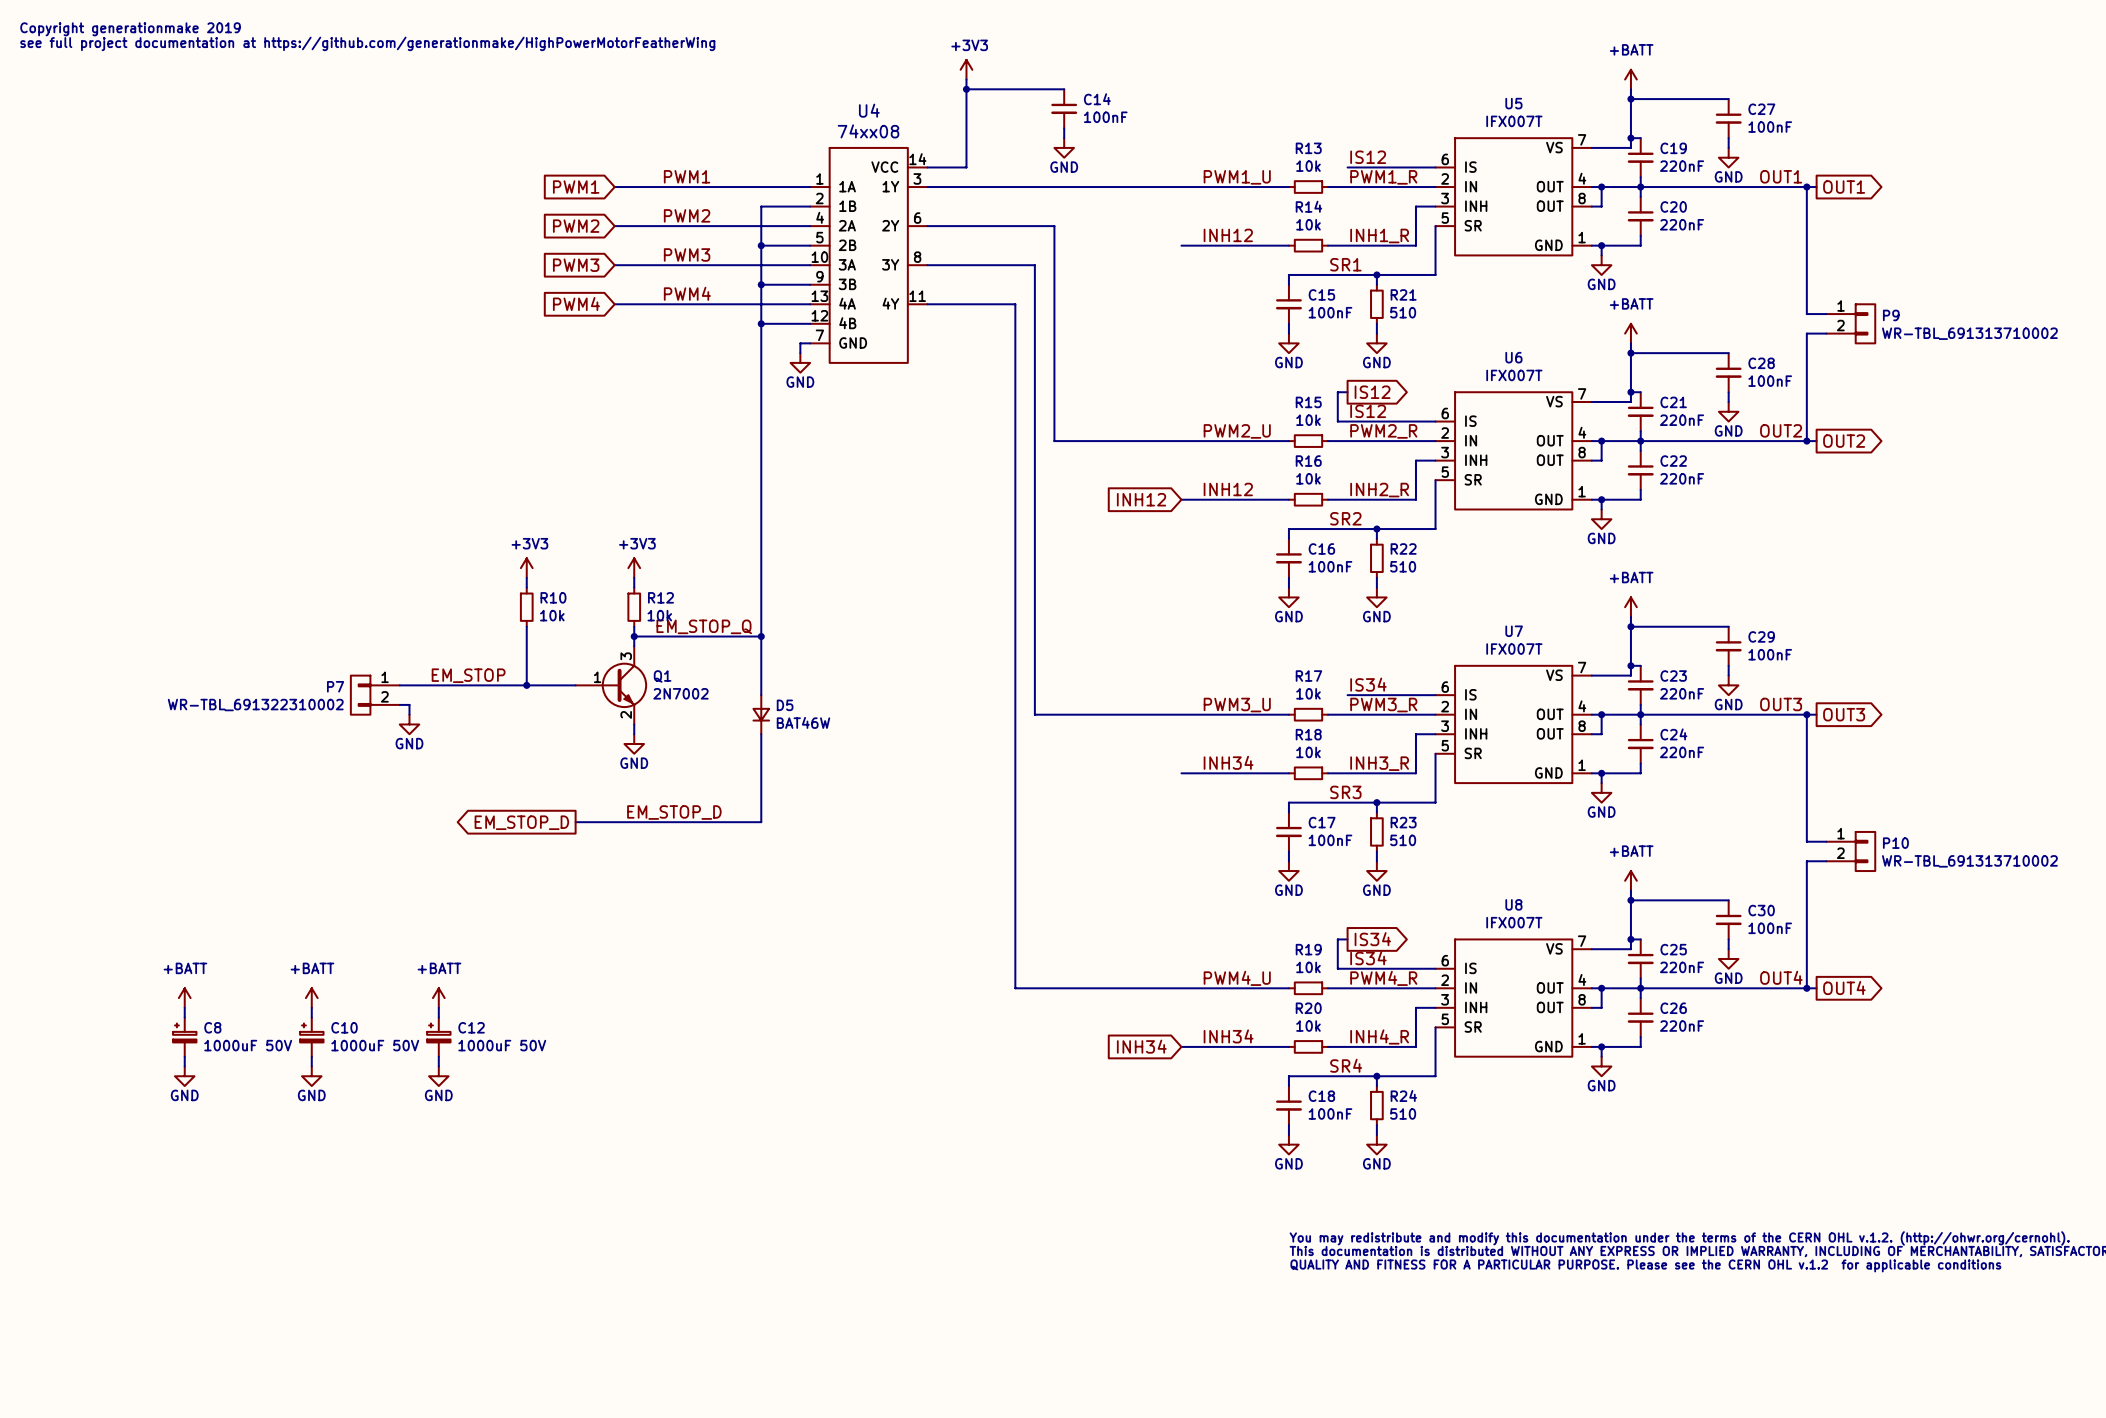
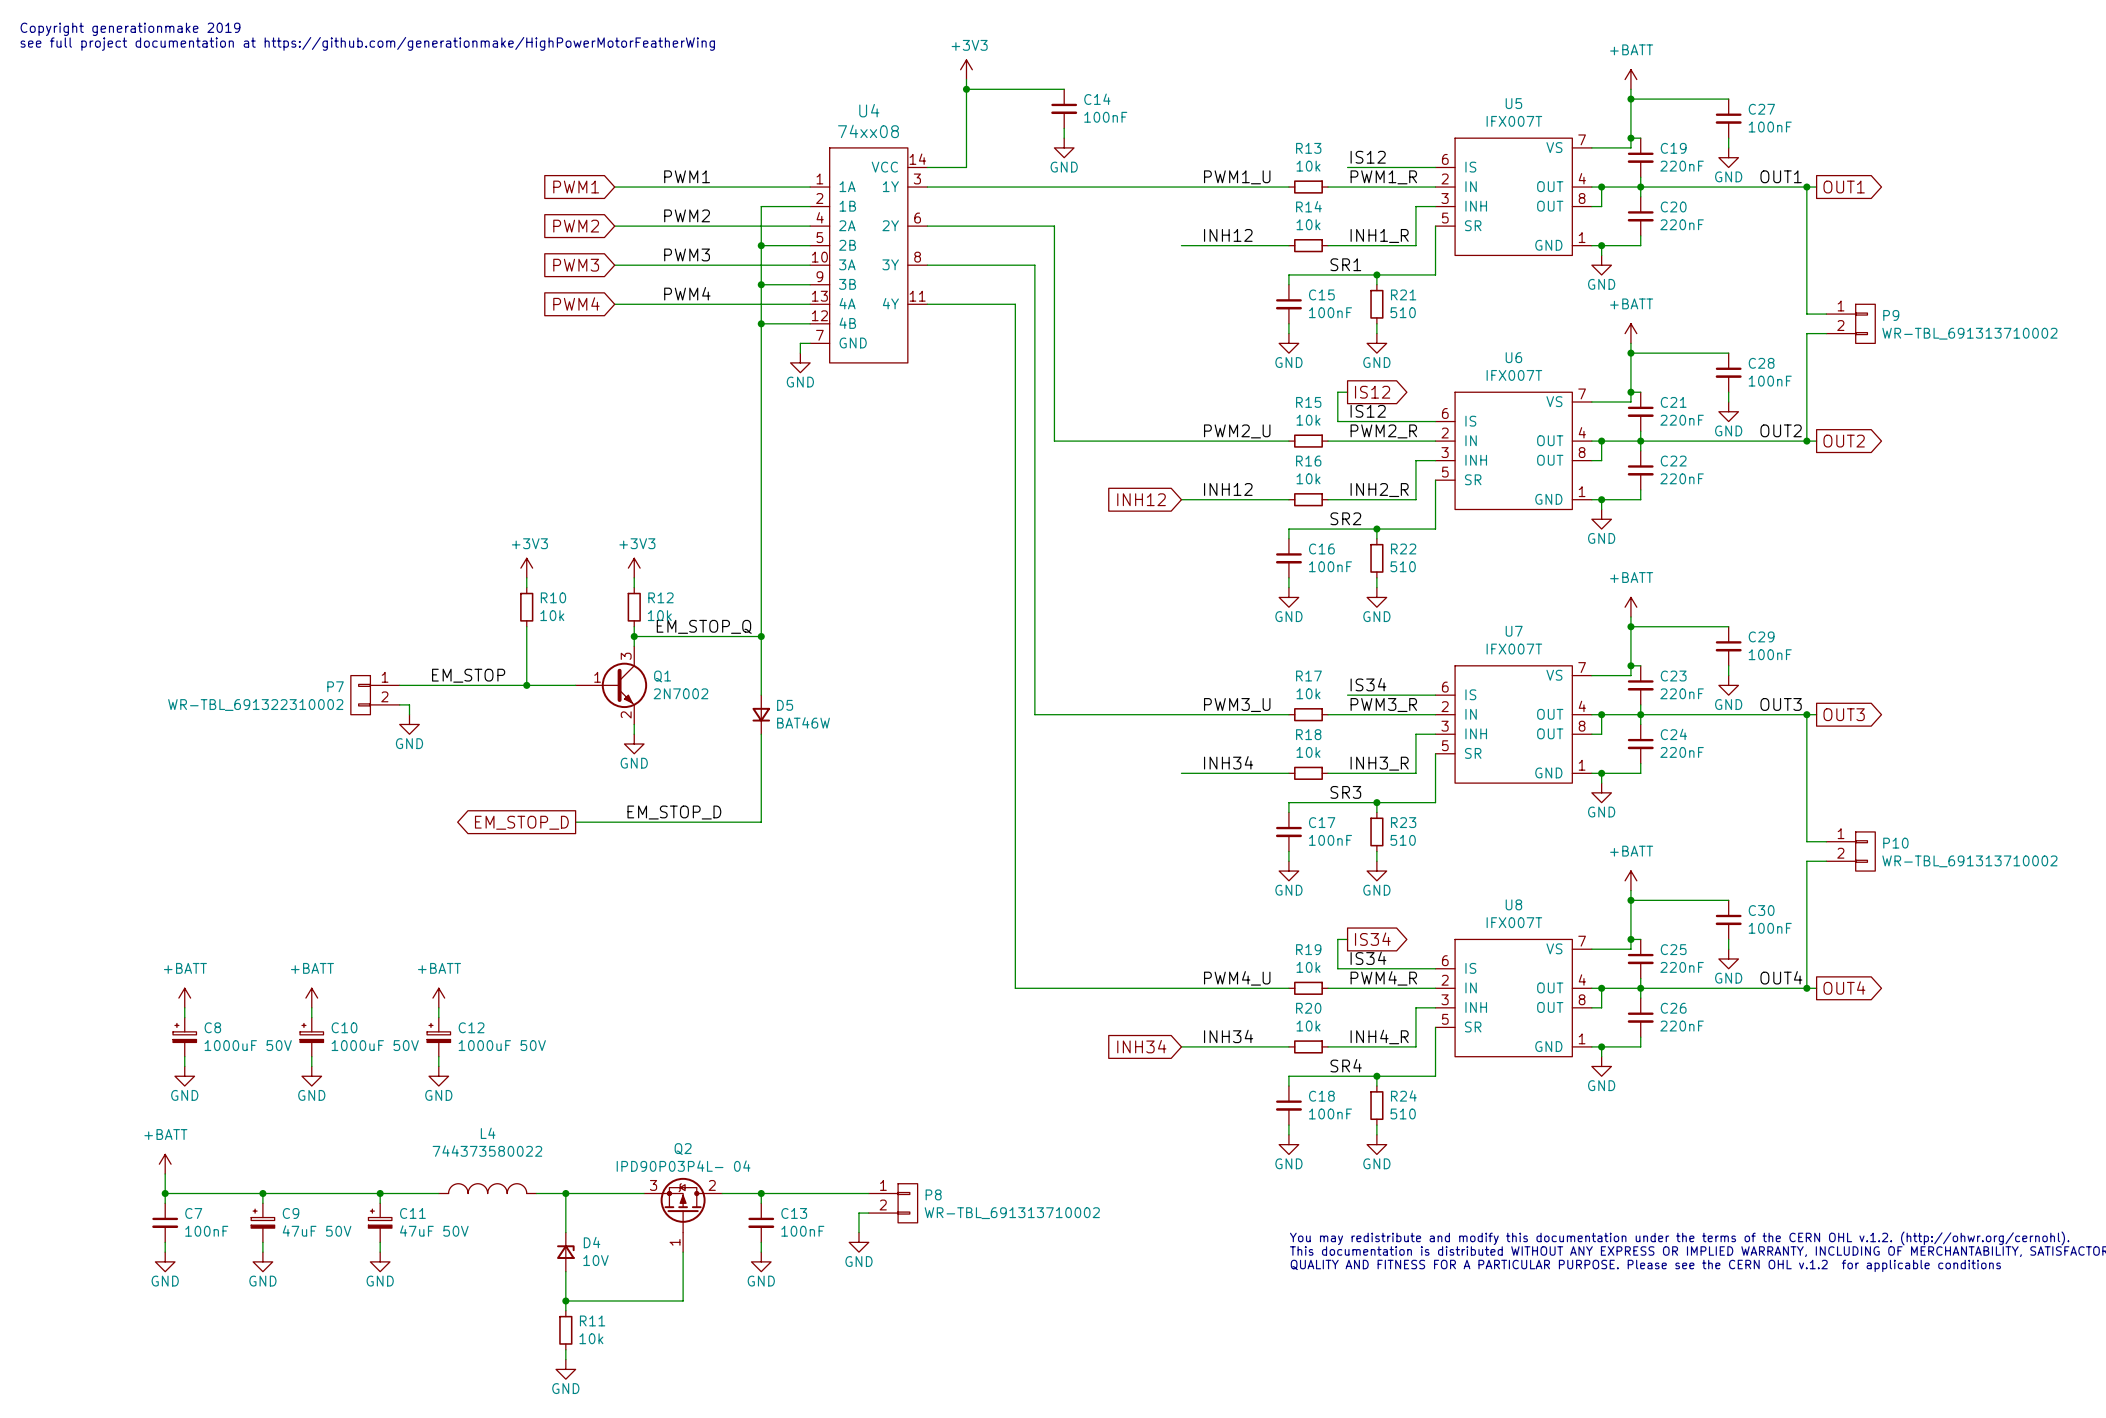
power symbol: none -> +BATT (165, 1164)
wire: none -> (165, 1173) (165, 1203)
L4: none -> 744373580022 (487, 1188)
wire: none -> (165, 1193) (438, 1193)
junction: none -> (165, 1193)
wire: none -> (262, 1193) (262, 1203)
junction: none -> (262, 1193)
wire: none -> (380, 1193) (380, 1203)
junction: none -> (380, 1193)
wire: none -> (536, 1193) (644, 1193)
wire: none -> (565, 1193) (565, 1232)
junction: none -> (565, 1193)
wire: none -> (722, 1193) (868, 1193)
wire: none -> (761, 1193) (761, 1203)
junction: none -> (761, 1193)
P8: none -> WR-TBL_691313710002 (893, 1203)
wire: none -> (868, 1213) (858, 1213) (858, 1232)
Q2: none -> IPD90P03P4L- 04 (683, 1215)
C7: none -> 100nF (165, 1222)
C9: none -> 47uF 50V (262, 1222)
C11: none -> 47uF 50V (380, 1222)
C13: none -> 100nF (761, 1222)
wire: none -> (165, 1242) (165, 1252)
wire: none -> (262, 1242) (262, 1252)
wire: none -> (380, 1242) (380, 1252)
wire: none -> (761, 1242) (761, 1252)
power symbol: none -> GND (858, 1242)
D4: none -> 10V (565, 1252)
wire: none -> (683, 1252) (683, 1300) (565, 1300)
power symbol: none -> GND (165, 1261)
power symbol: none -> GND (262, 1261)
power symbol: none -> GND (380, 1261)
power symbol: none -> GND (761, 1261)
wire: none -> (565, 1271) (565, 1310)
junction: none -> (565, 1300)
R11: none -> 10k (565, 1330)
wire: none -> (565, 1349) (565, 1359)
power symbol: none -> GND (565, 1369)

